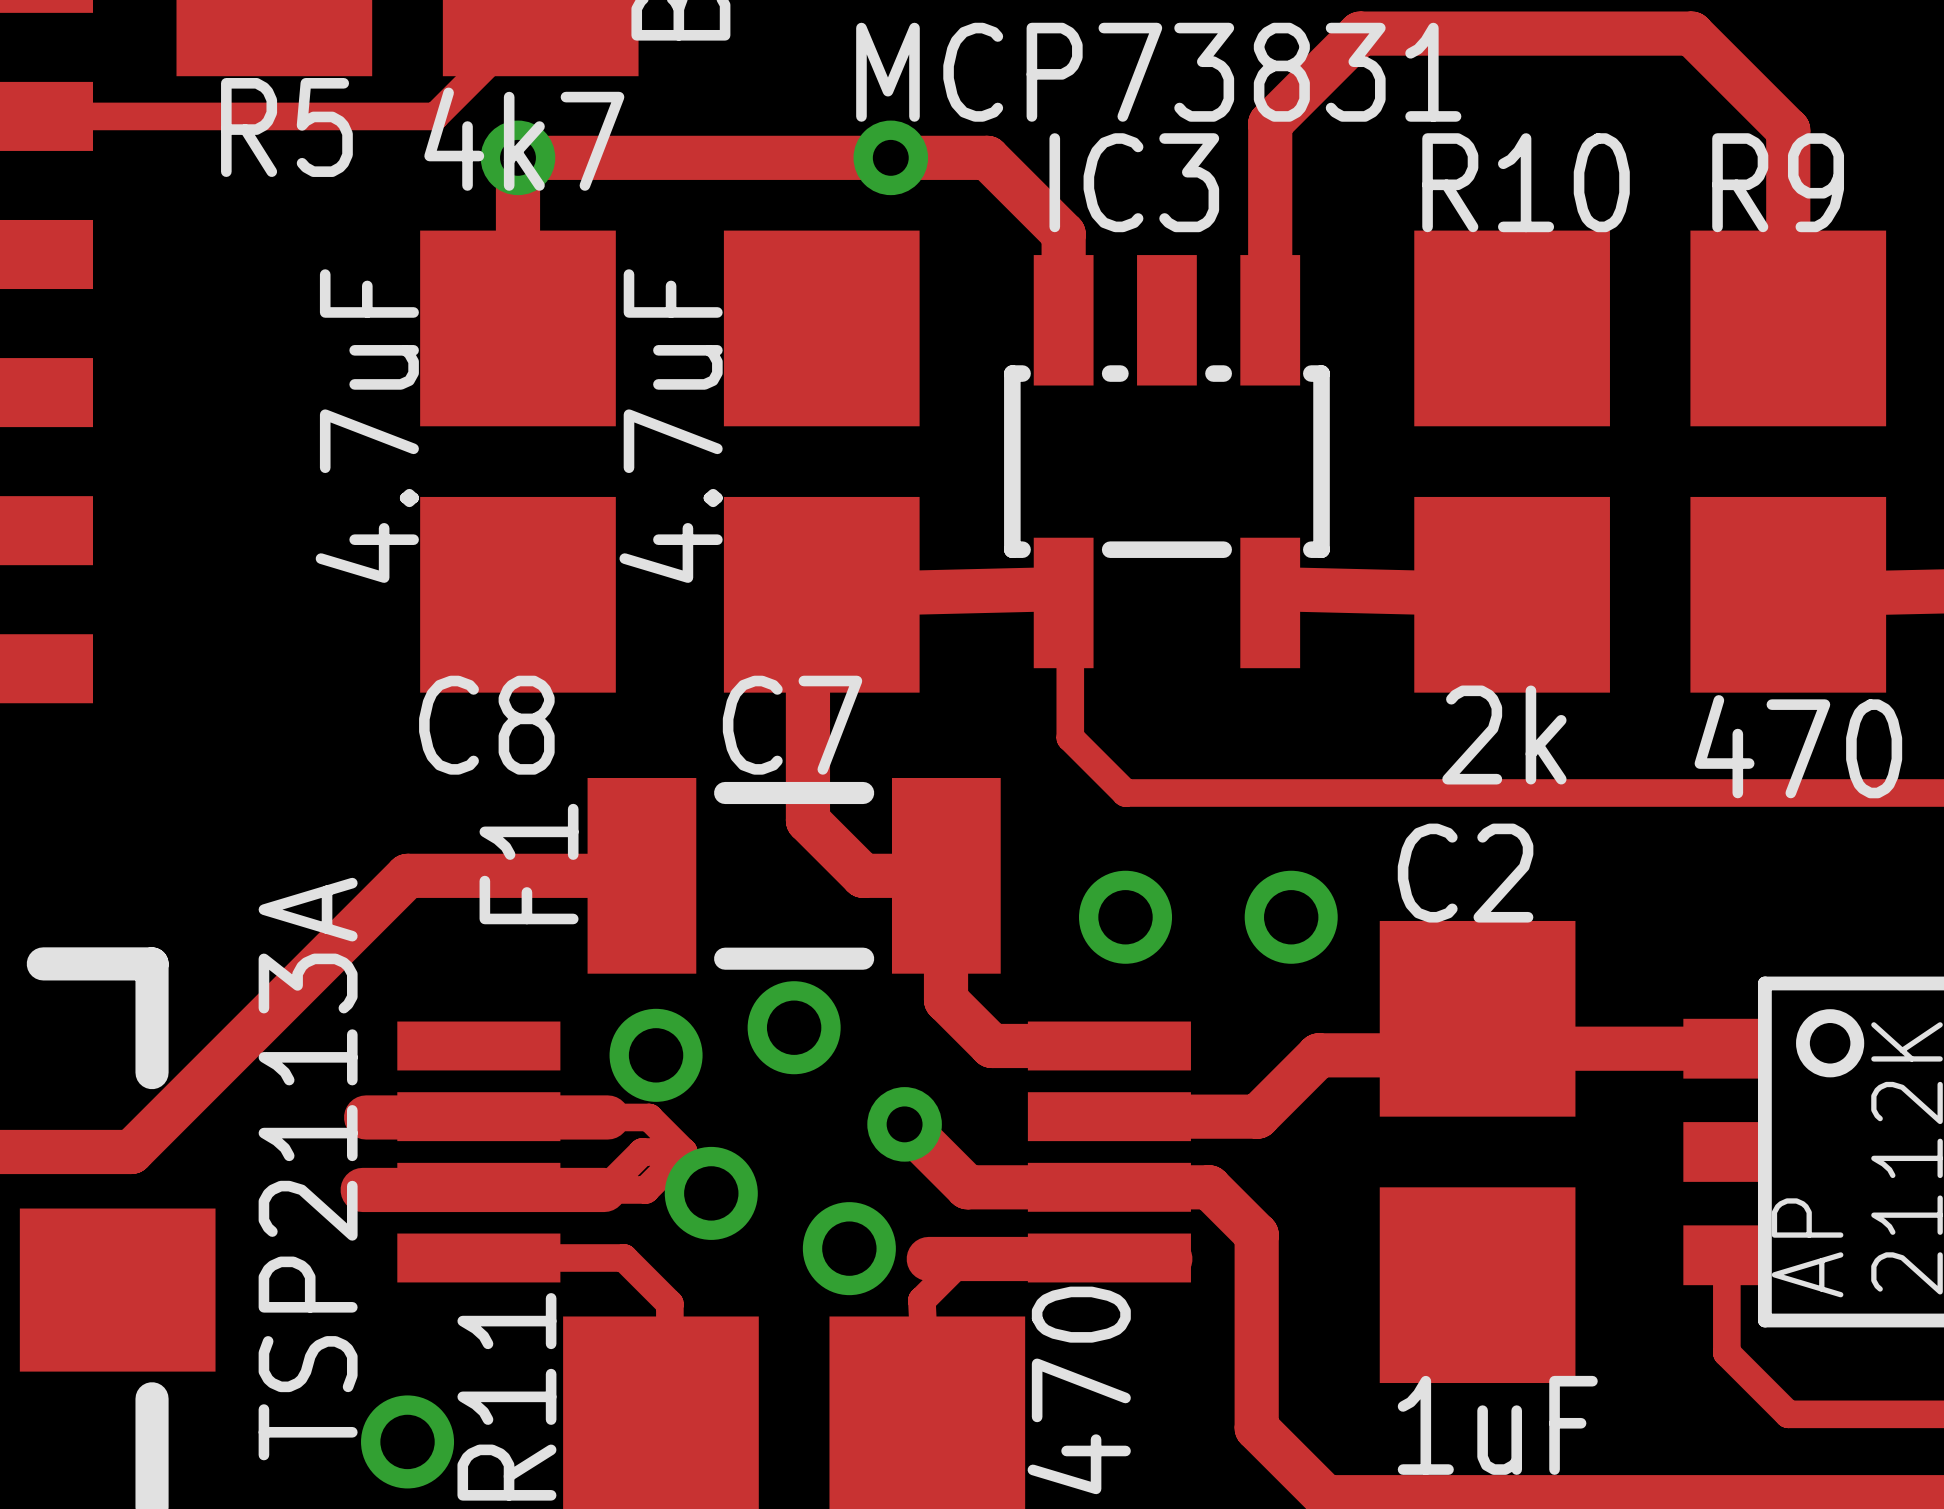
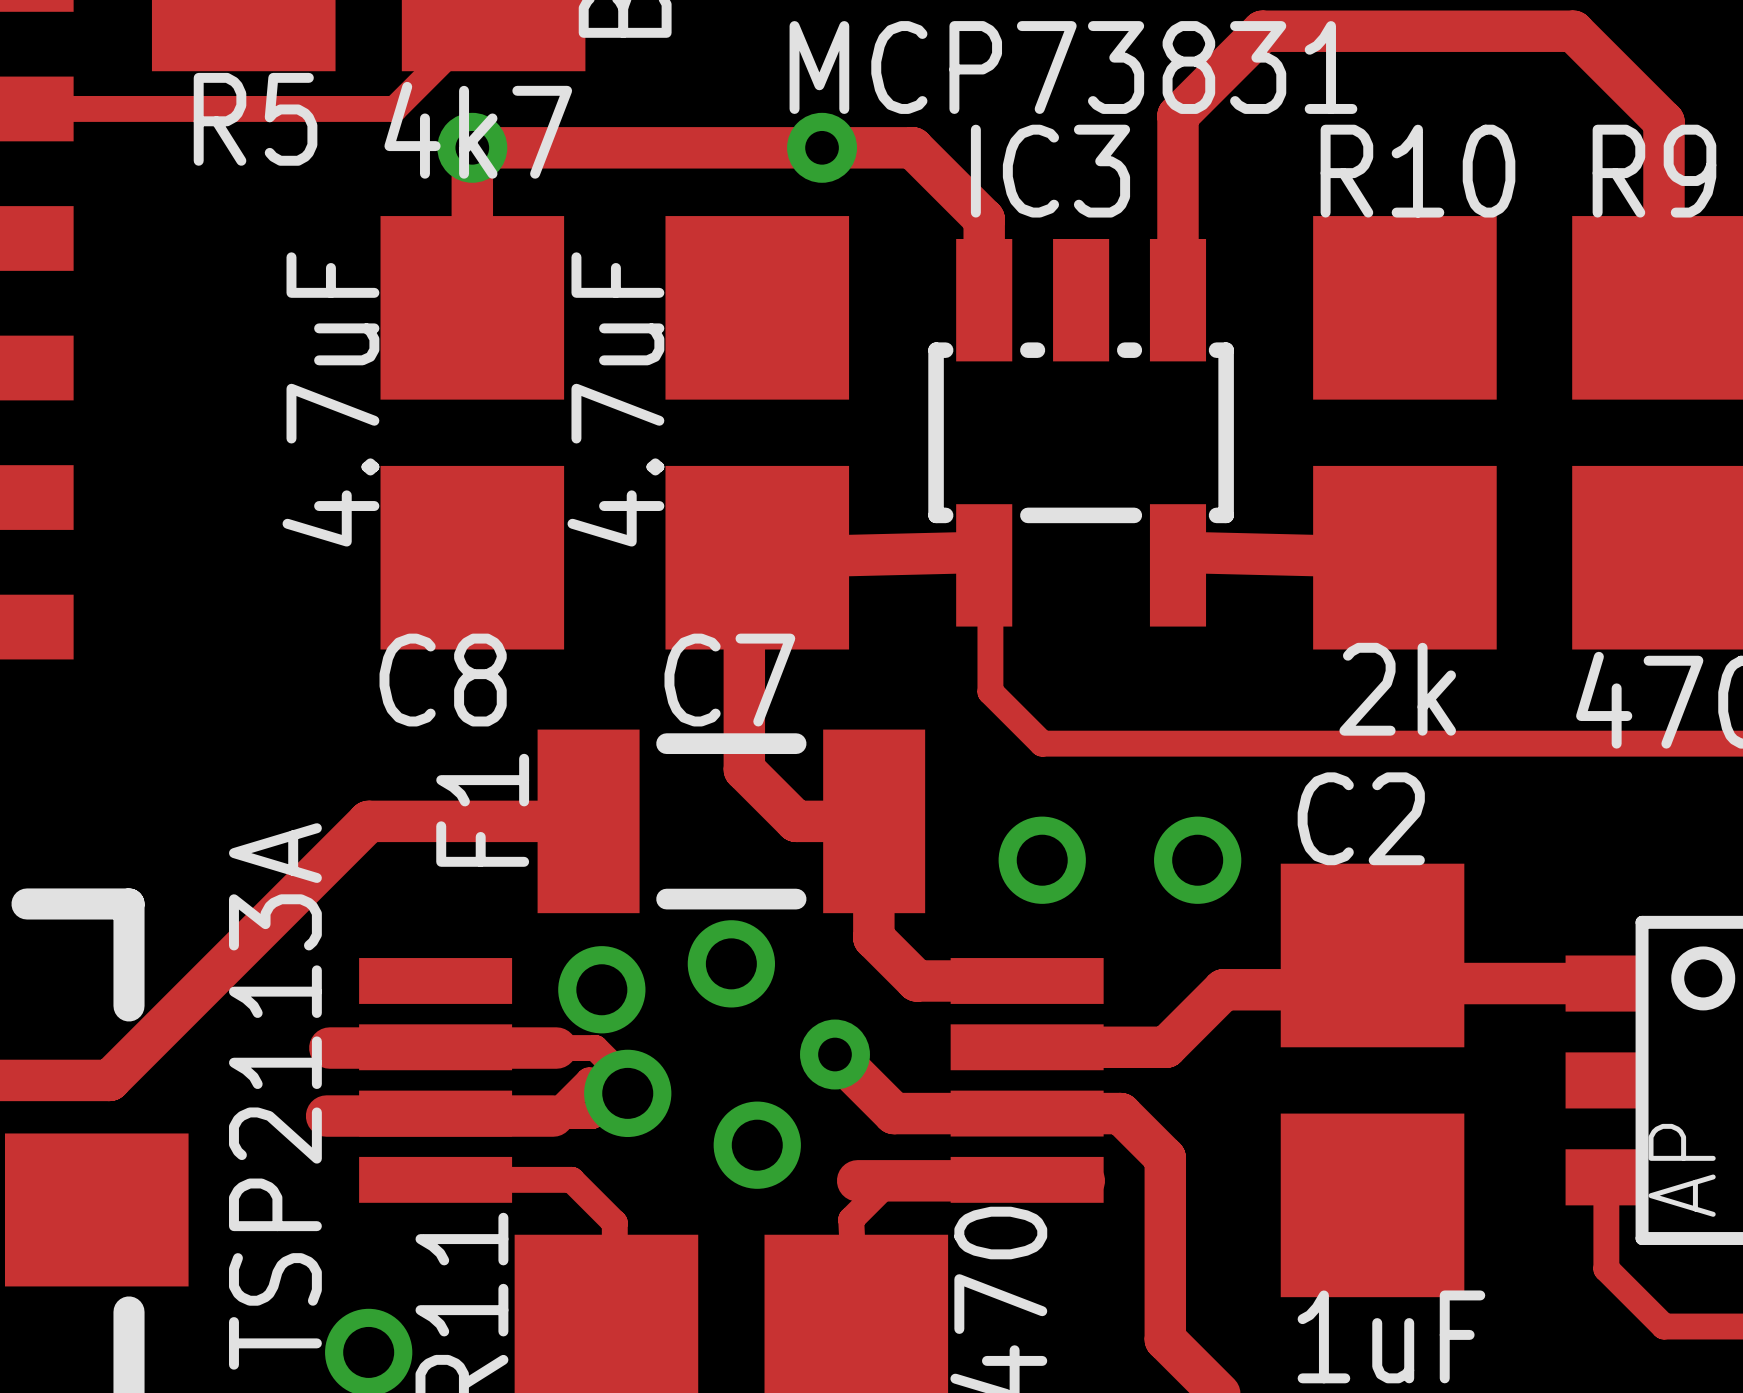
via position: (711, 1193) -> (627, 1093)
via position: (849, 1248) -> (757, 1145)

